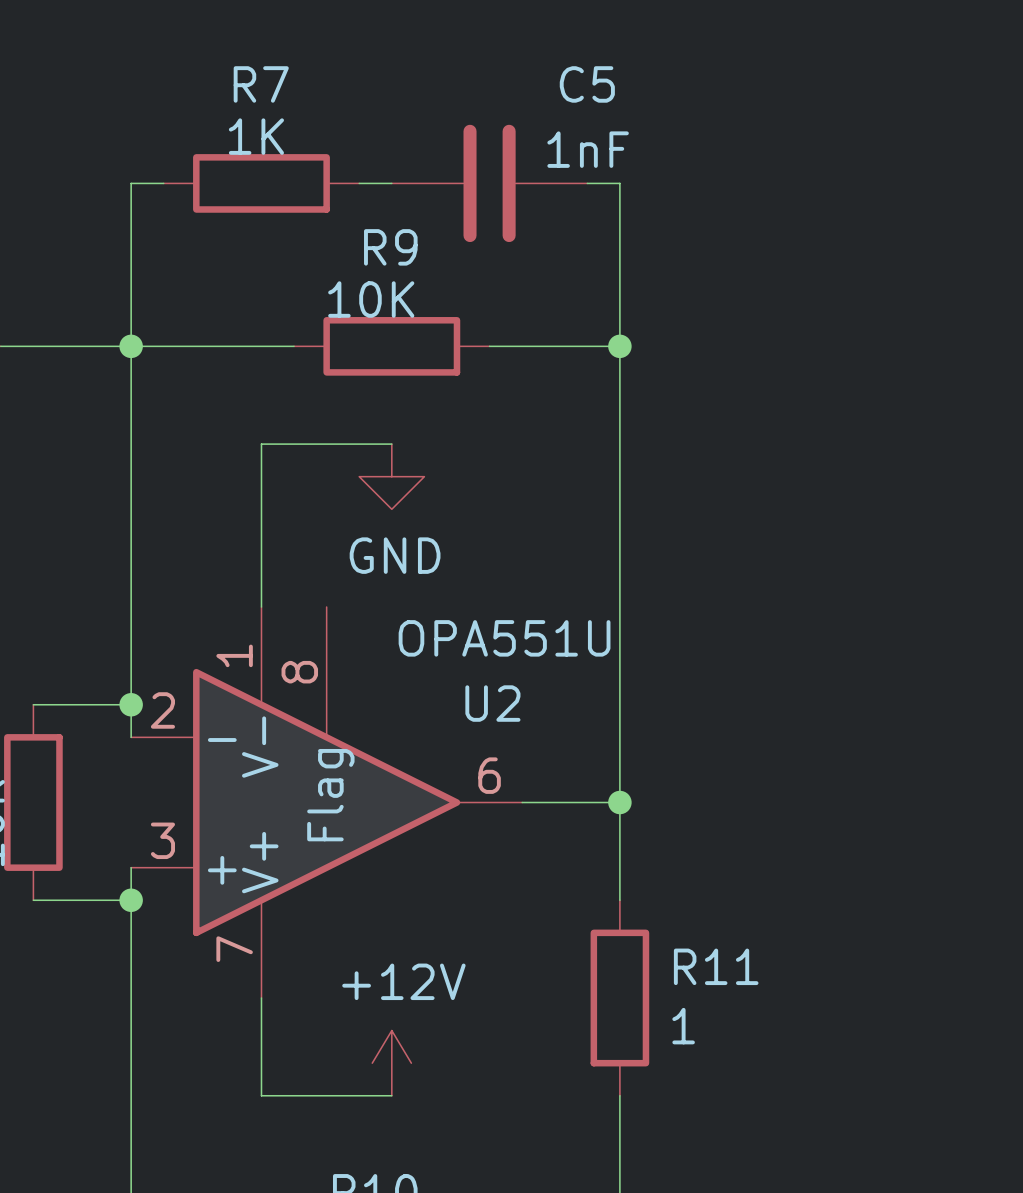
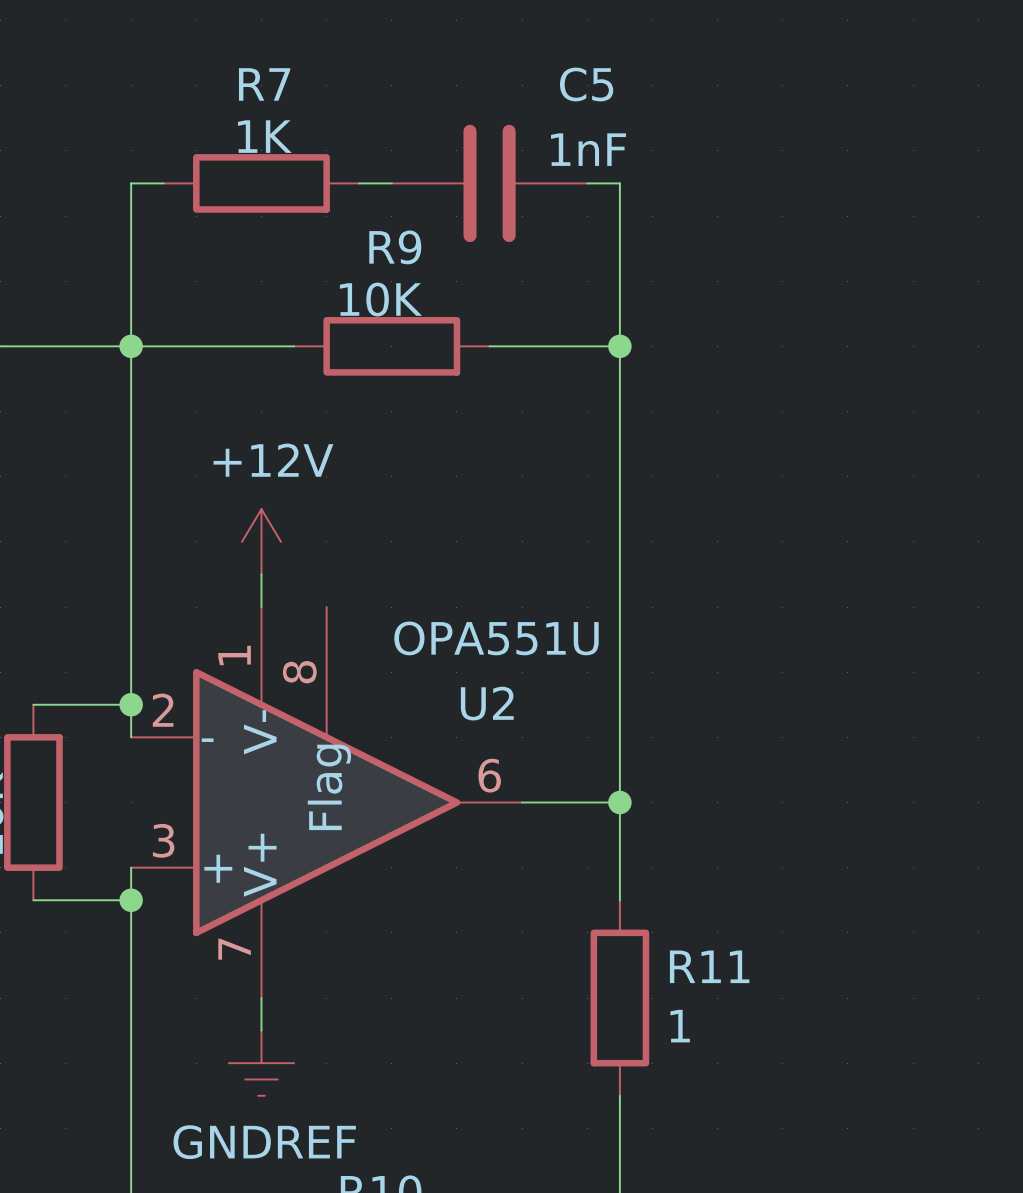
wire: (391, 444) (261, 444) (261, 574) -> none
power symbol: GND (391, 476) -> none
wire: (261, 1030) (261, 1095) (391, 1095) -> none
power symbol: none -> GNDREF (261, 1063)
power symbol position: +12V (391, 1063) -> +12V (261, 541)

